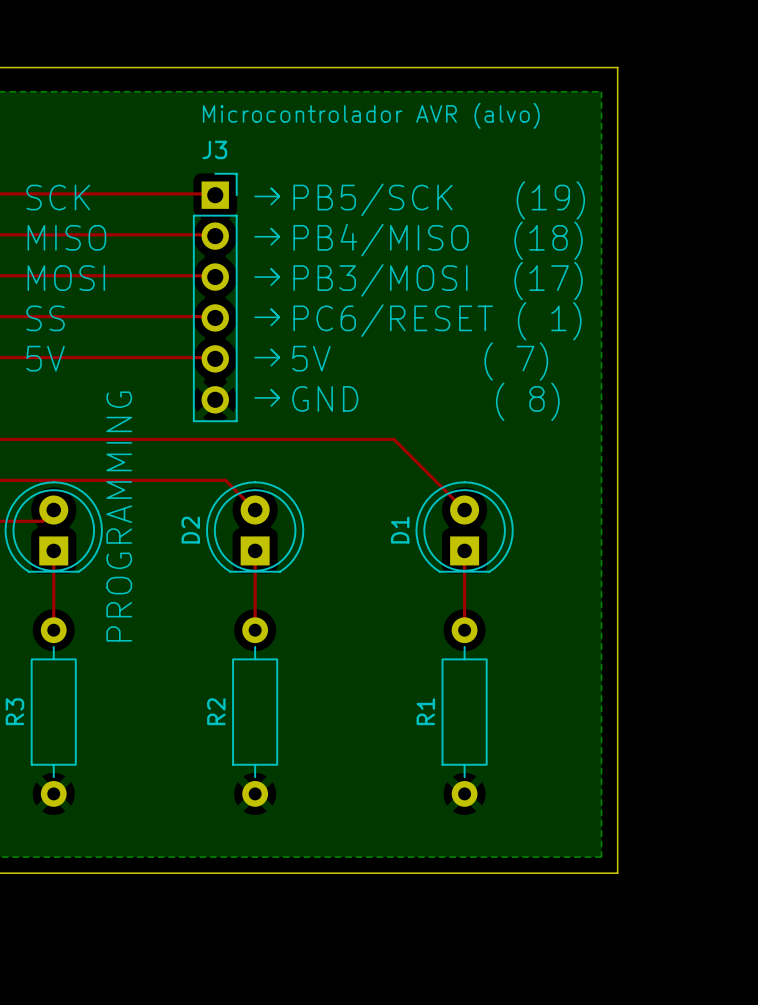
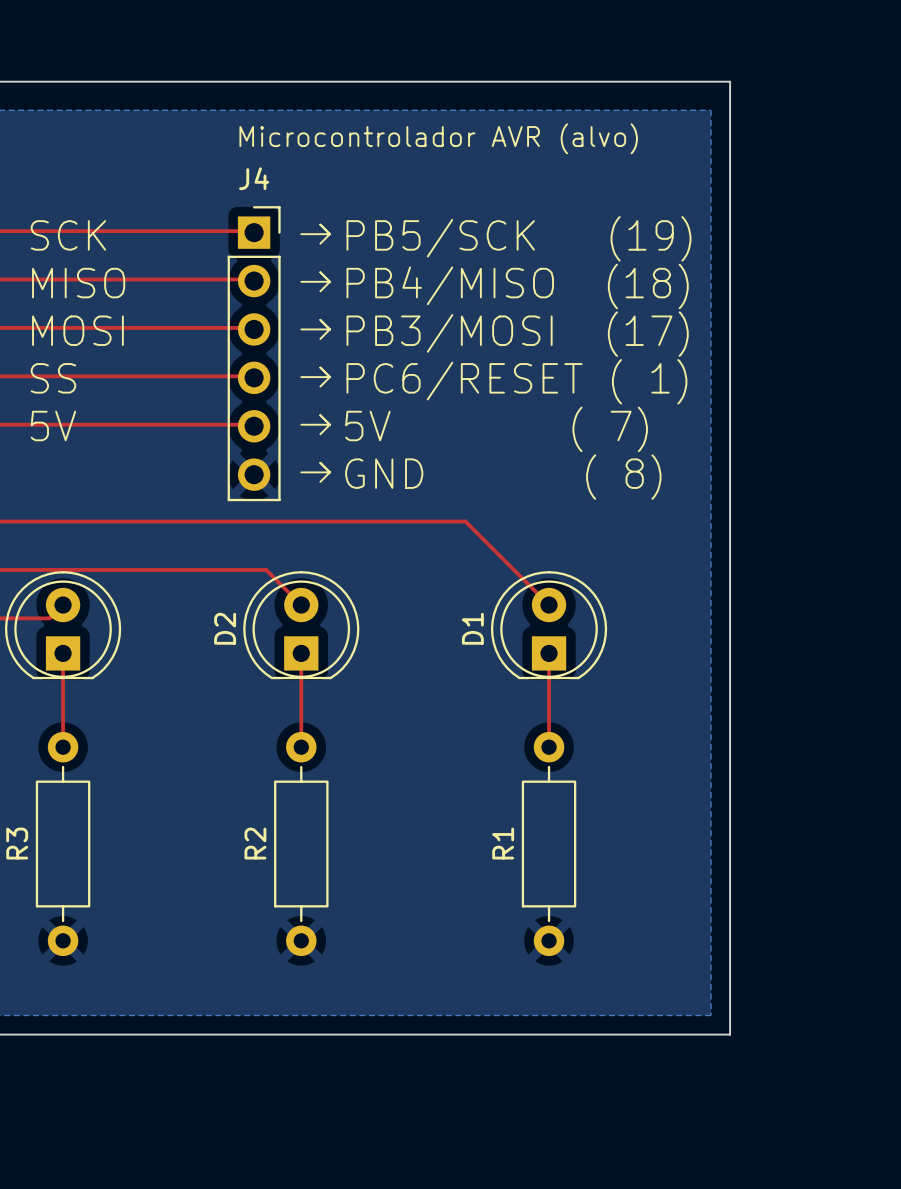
J3 name: J3 (214, 149) -> J4 (254, 178)
text: PROGRAMMING (119, 516) -> none

